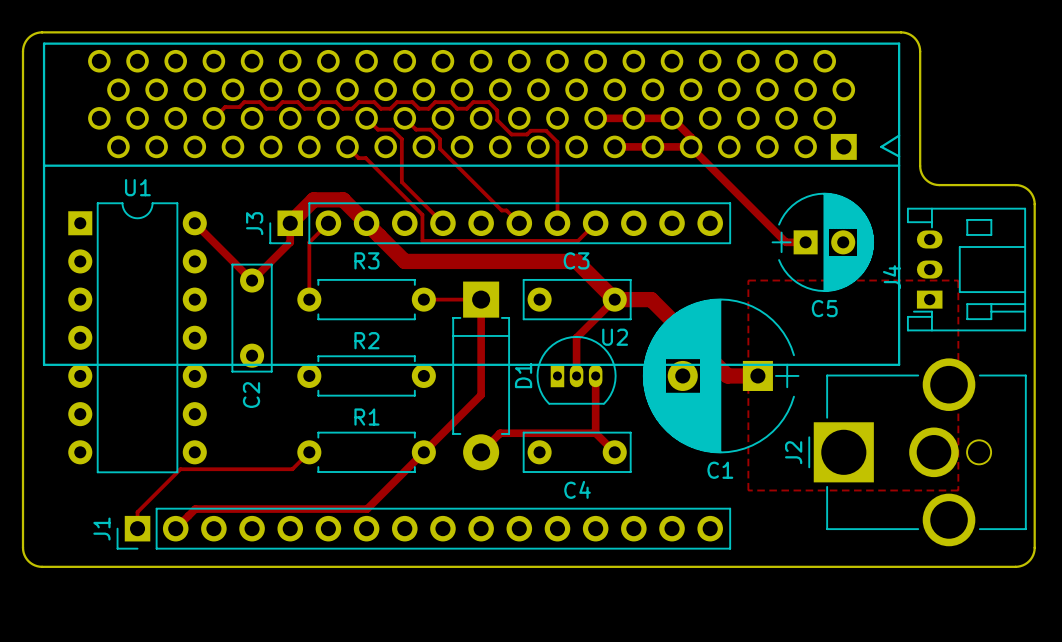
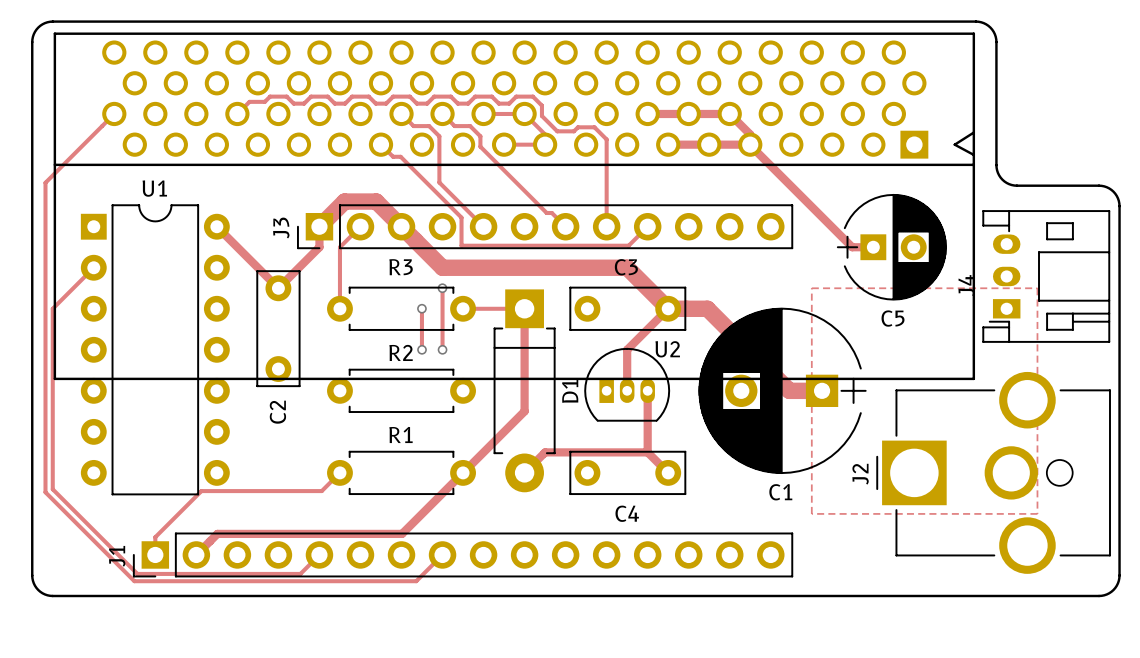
track: none -> (114, 113) (45, 182) (45, 492) (134, 581) (416, 581) (442, 554)
track: none -> (483, 113) (524, 113) (545, 134) (545, 144) (504, 144)
track: none -> (93, 267) (52, 308) (52, 489) (137, 573) (300, 573) (319, 554)
track: none -> (442, 288) (442, 349)
via: none -> (442, 288)
track: none -> (421, 308) (421, 349)
via: none -> (421, 308)
via: none -> (422, 349)
via: none -> (442, 349)

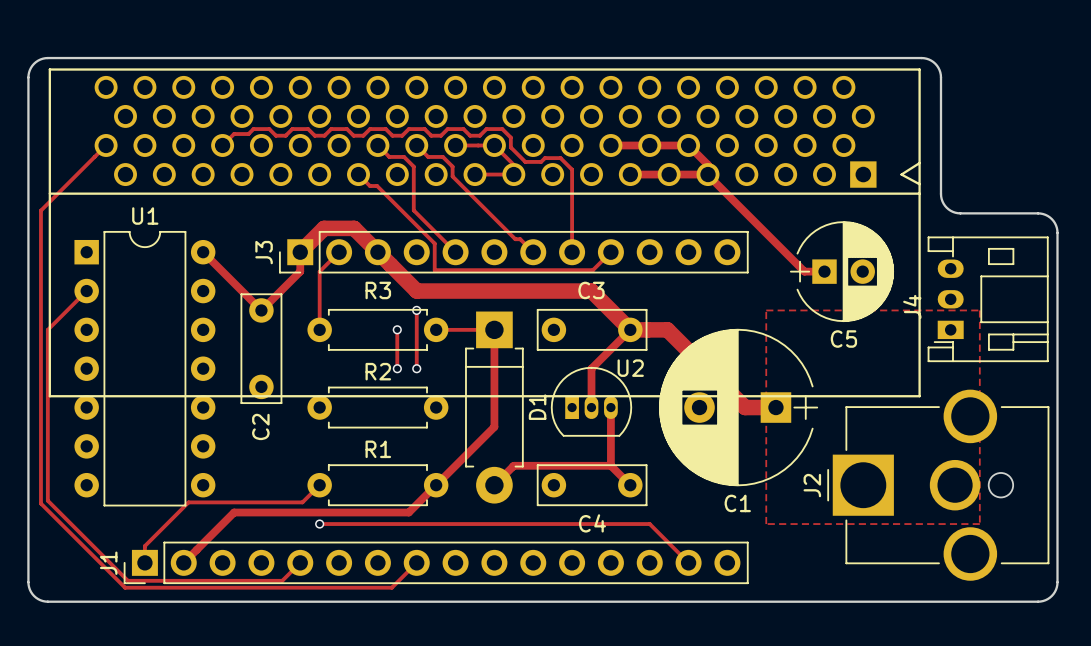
track: (434, 501) (402, 533) (217, 533) -> (408, 512) (234, 512) (203, 542)
track: none -> (319, 524) (649, 524) (688, 562)
via: none -> (319, 524)

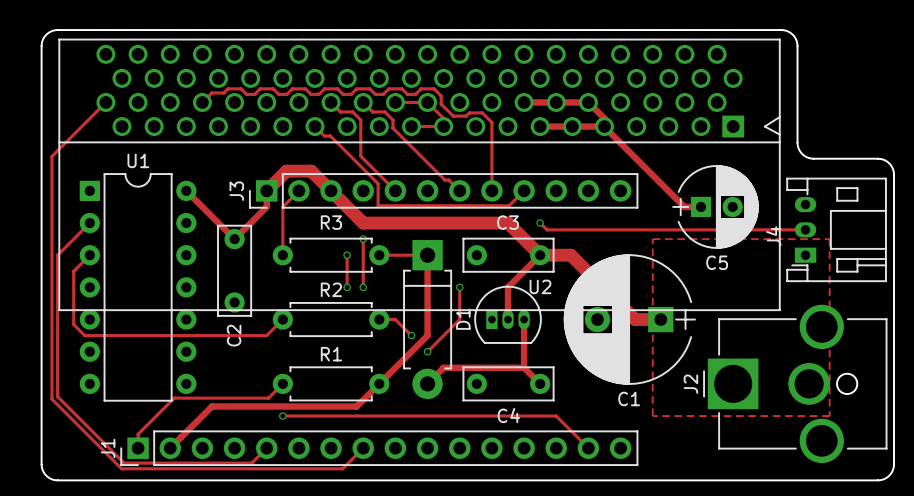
track: none -> (540, 223) (547, 229) (805, 229)
via: none -> (540, 223)
track: none -> (89, 255) (73, 271) (73, 324) (84, 335) (266, 335) (282, 319)
track: none -> (459, 287) (459, 319) (427, 351)
via: none -> (459, 287)
track: none -> (379, 319) (395, 319) (411, 335)
via: none -> (411, 335)
via: none -> (427, 351)

